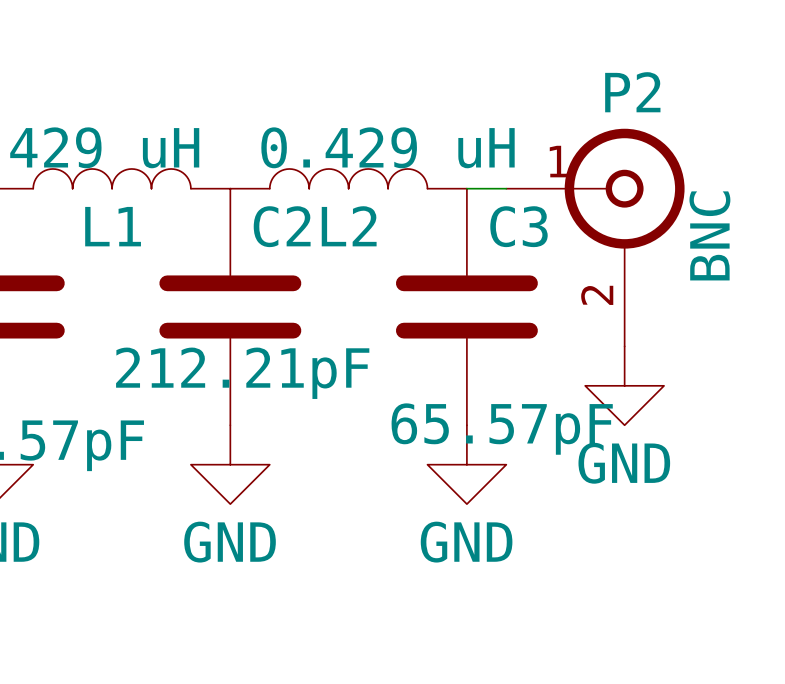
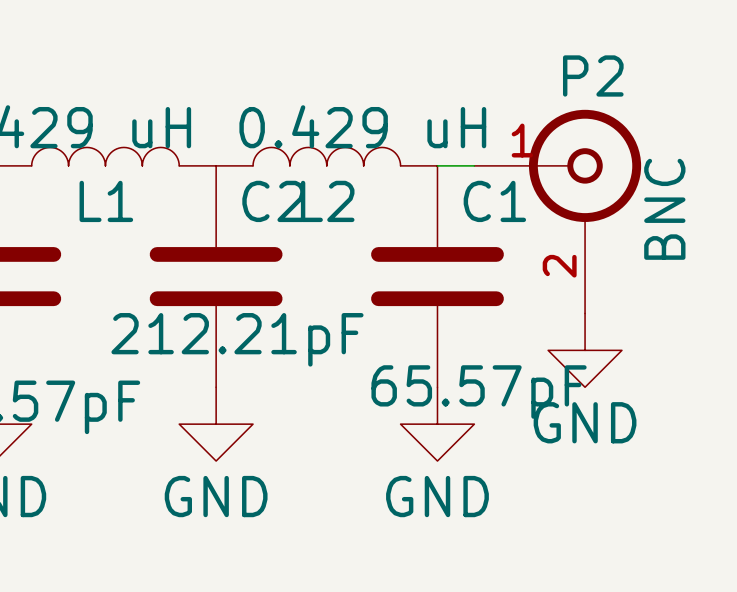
C3 name: C3 (518, 226) -> C1 (494, 201)

